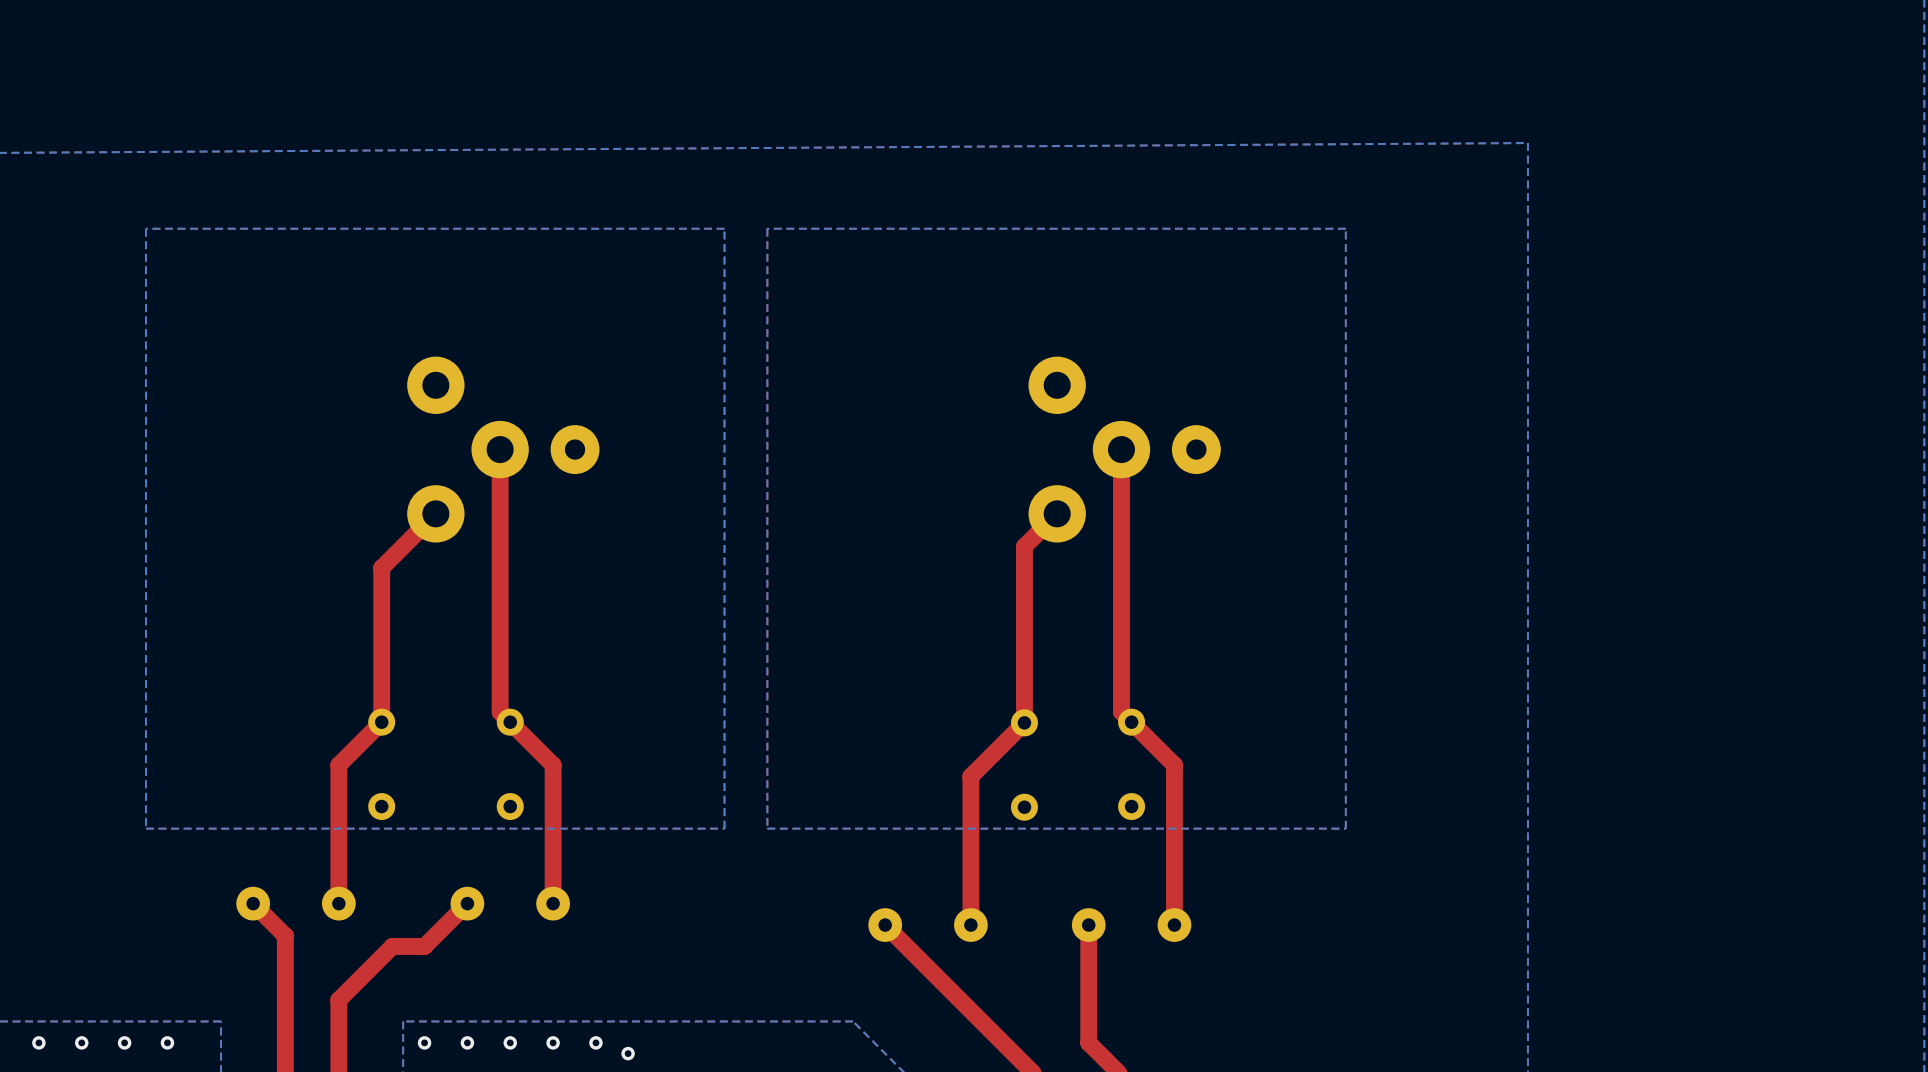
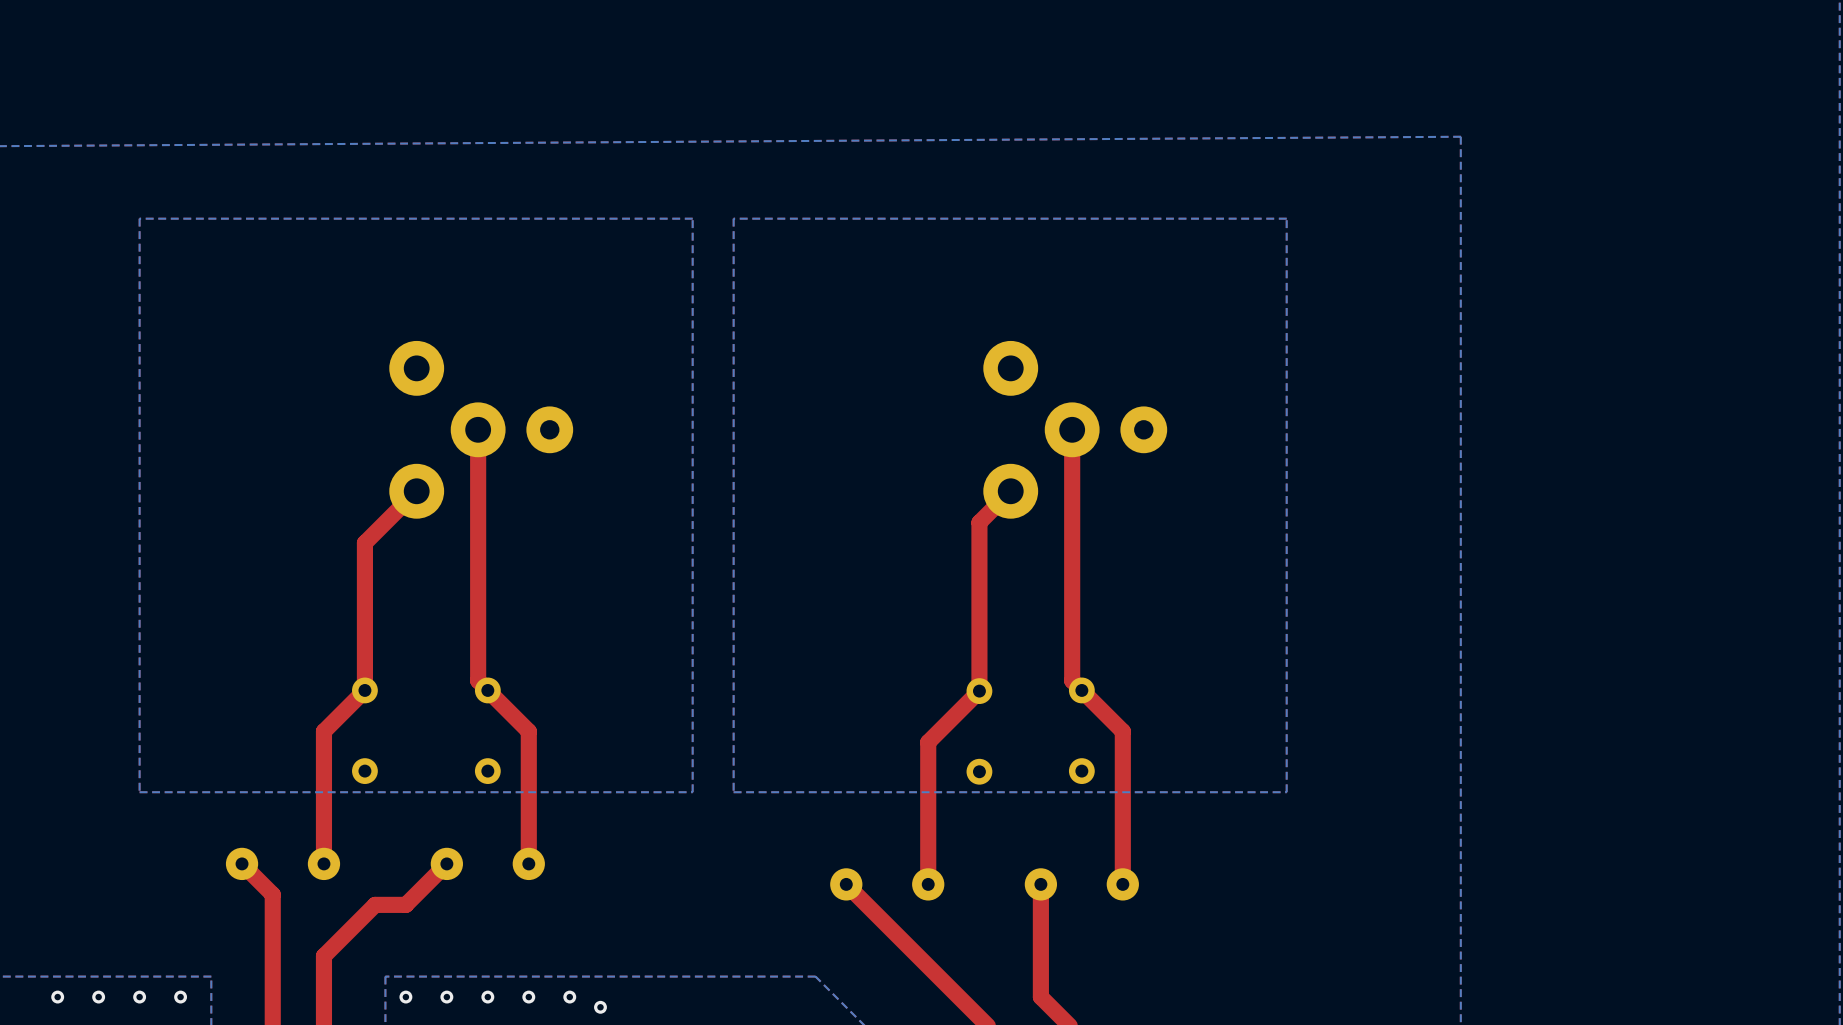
via: (38, 1042) -> none
via: none -> (57, 997)
via: (81, 1042) -> none
via: none -> (98, 997)
via: (124, 1042) -> none
via: none -> (139, 997)
via: (167, 1042) -> none
via: none -> (180, 997)

